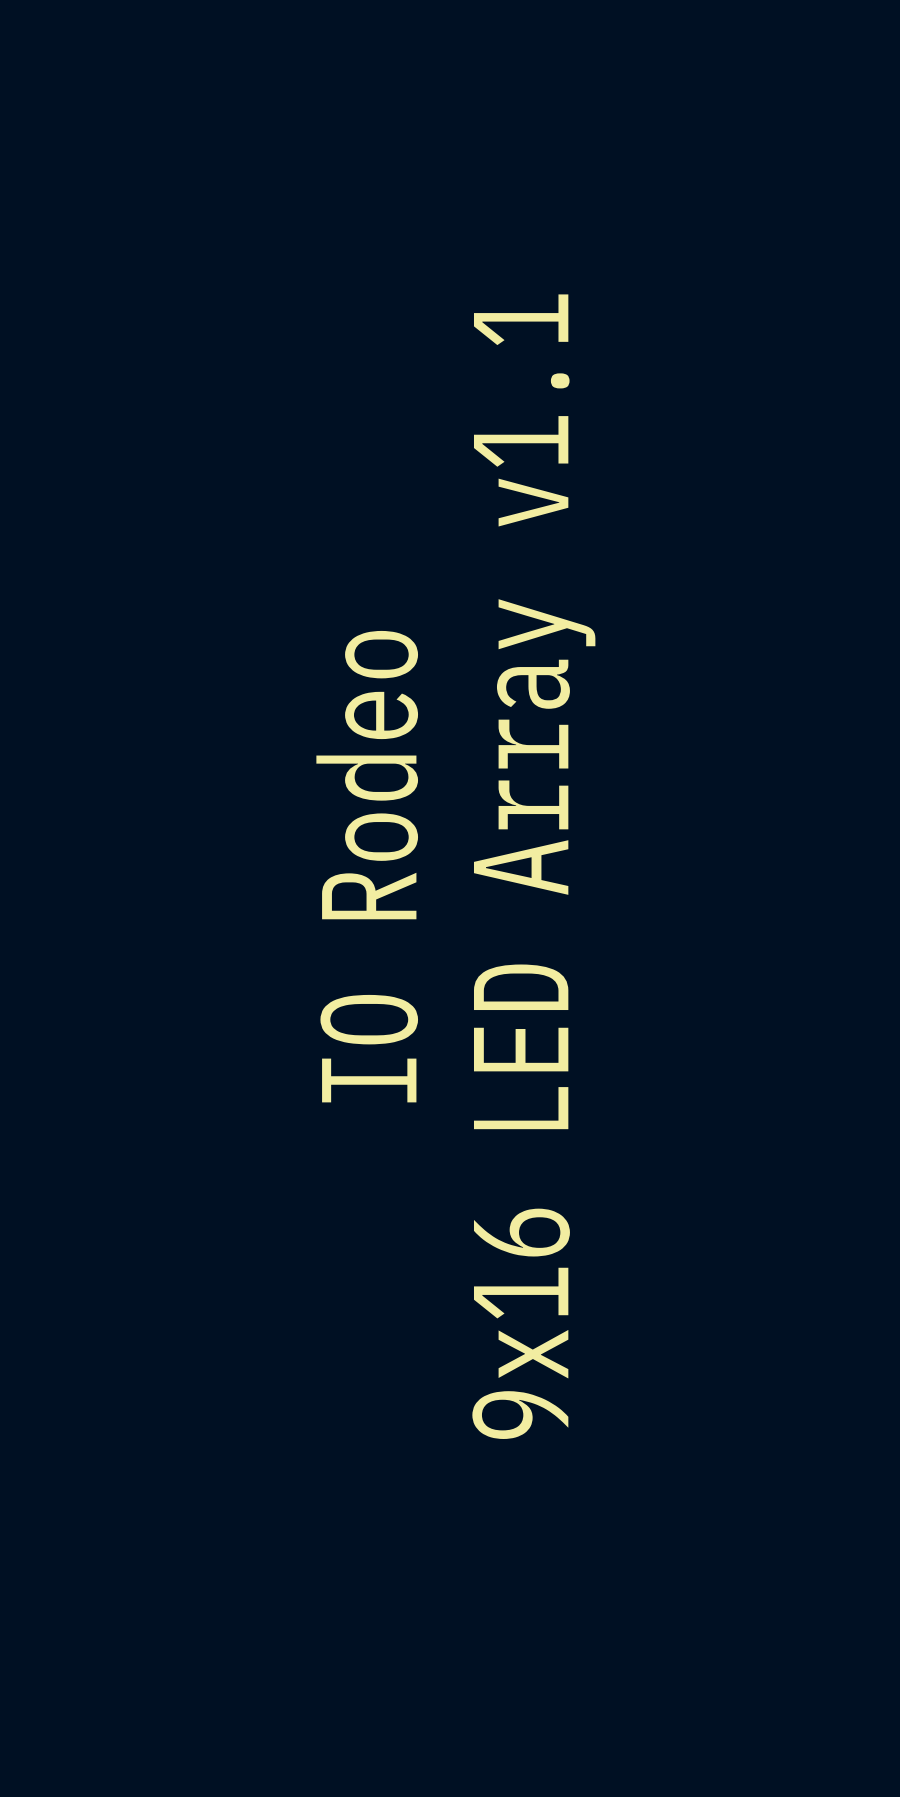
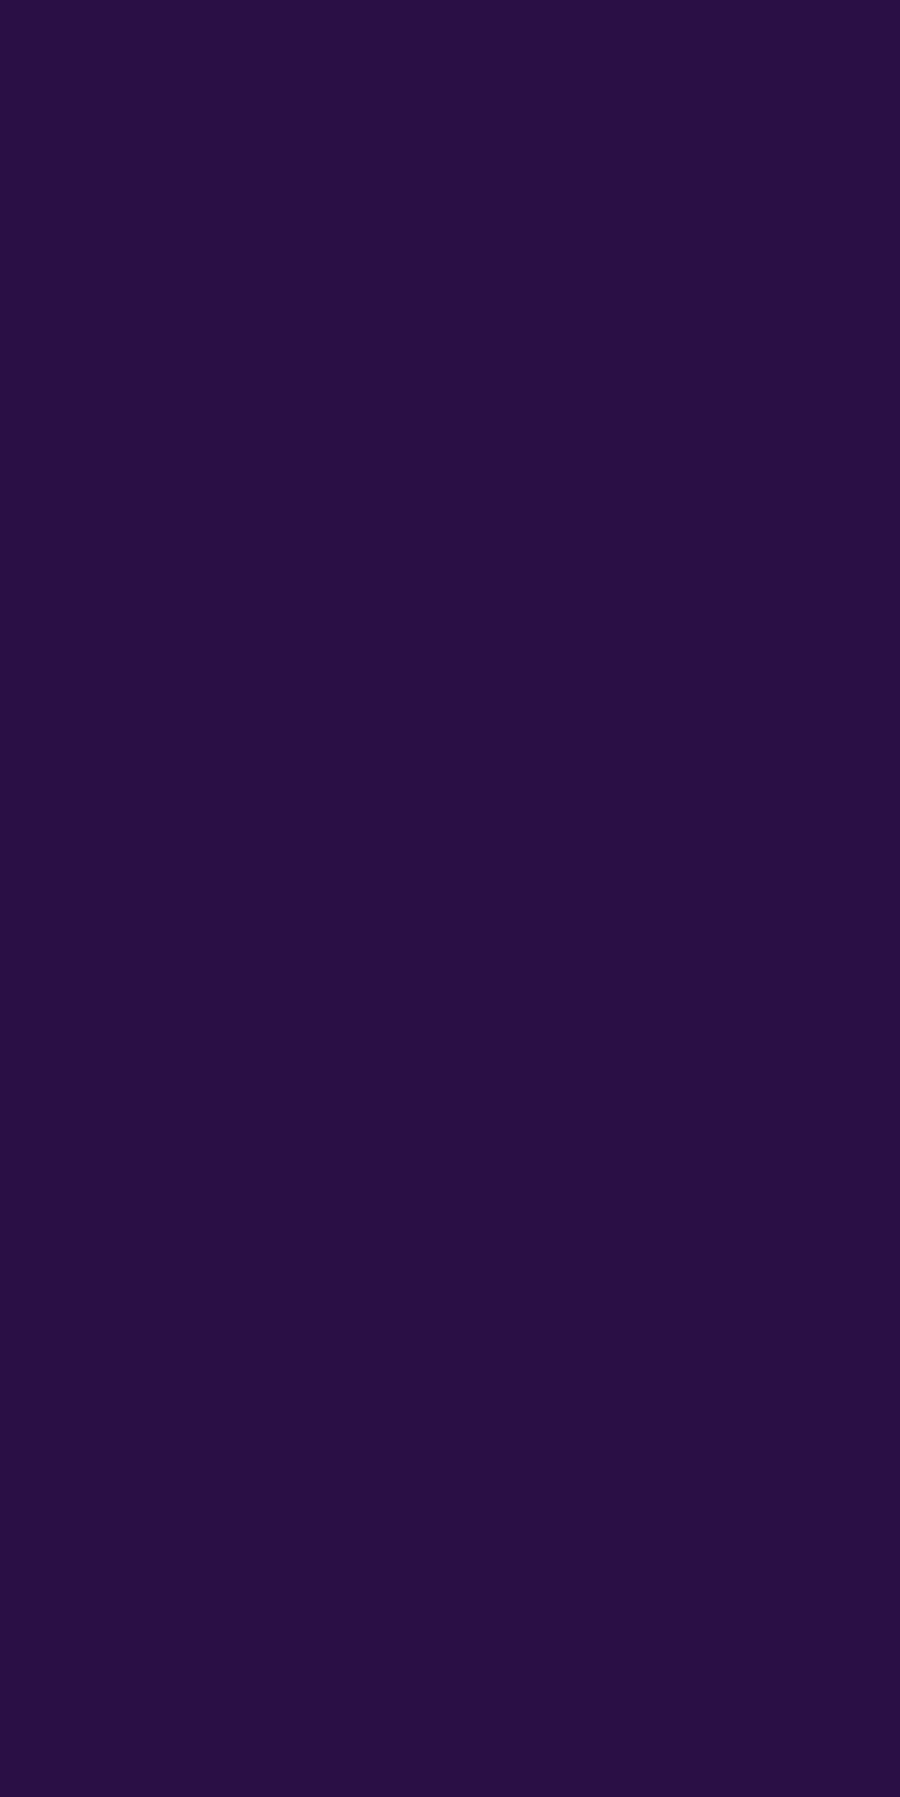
text: IO Rodeo (367, 866) -> none
text: 9x16 LED Array v1.1 (533, 866) -> none

